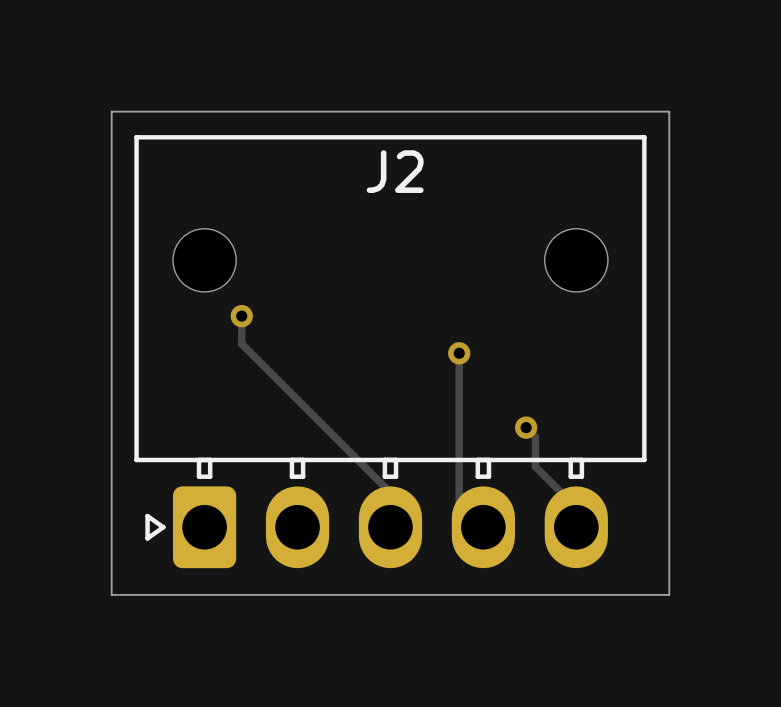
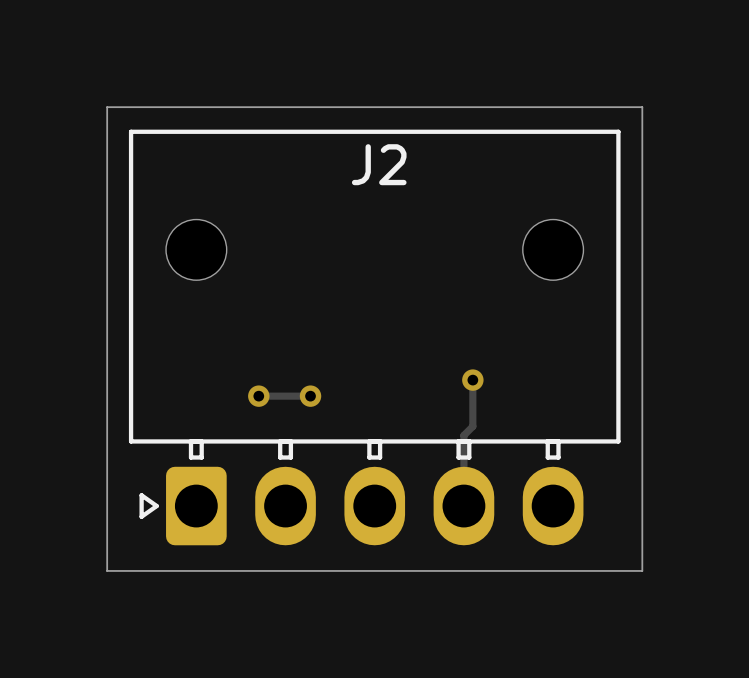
track: (241, 316) (241, 343) (390, 492) (390, 527) -> none
via: (241, 316) -> none
via: (459, 353) -> none
track: (459, 355) (459, 503) (483, 527) -> (472, 380) (472, 426) (463, 435) (463, 506)
via: none -> (472, 380)
via: none -> (258, 396)
track: none -> (310, 396) (255, 396)
via: none -> (310, 396)
track: (526, 427) (535, 436) (535, 466) (576, 507) (576, 527) -> none
via: (526, 427) -> none

